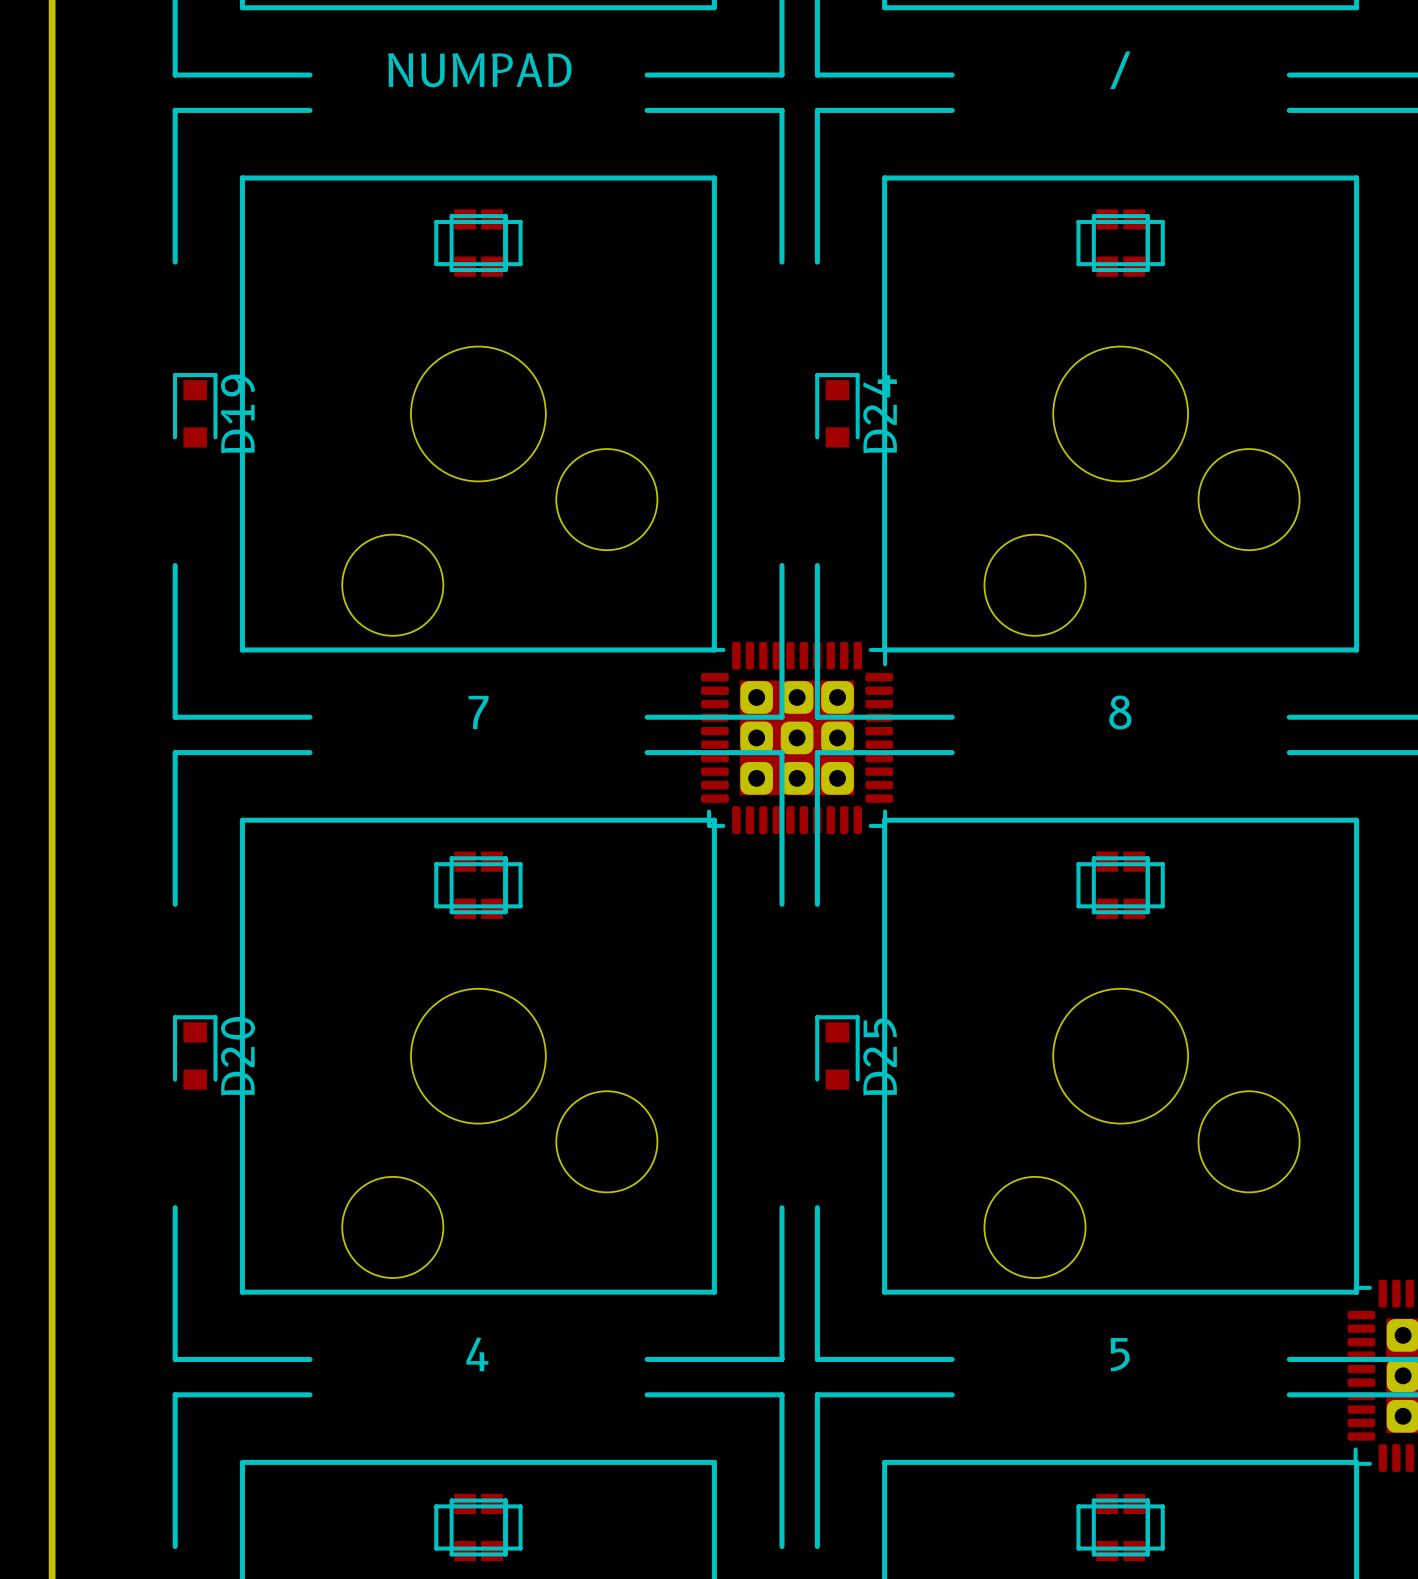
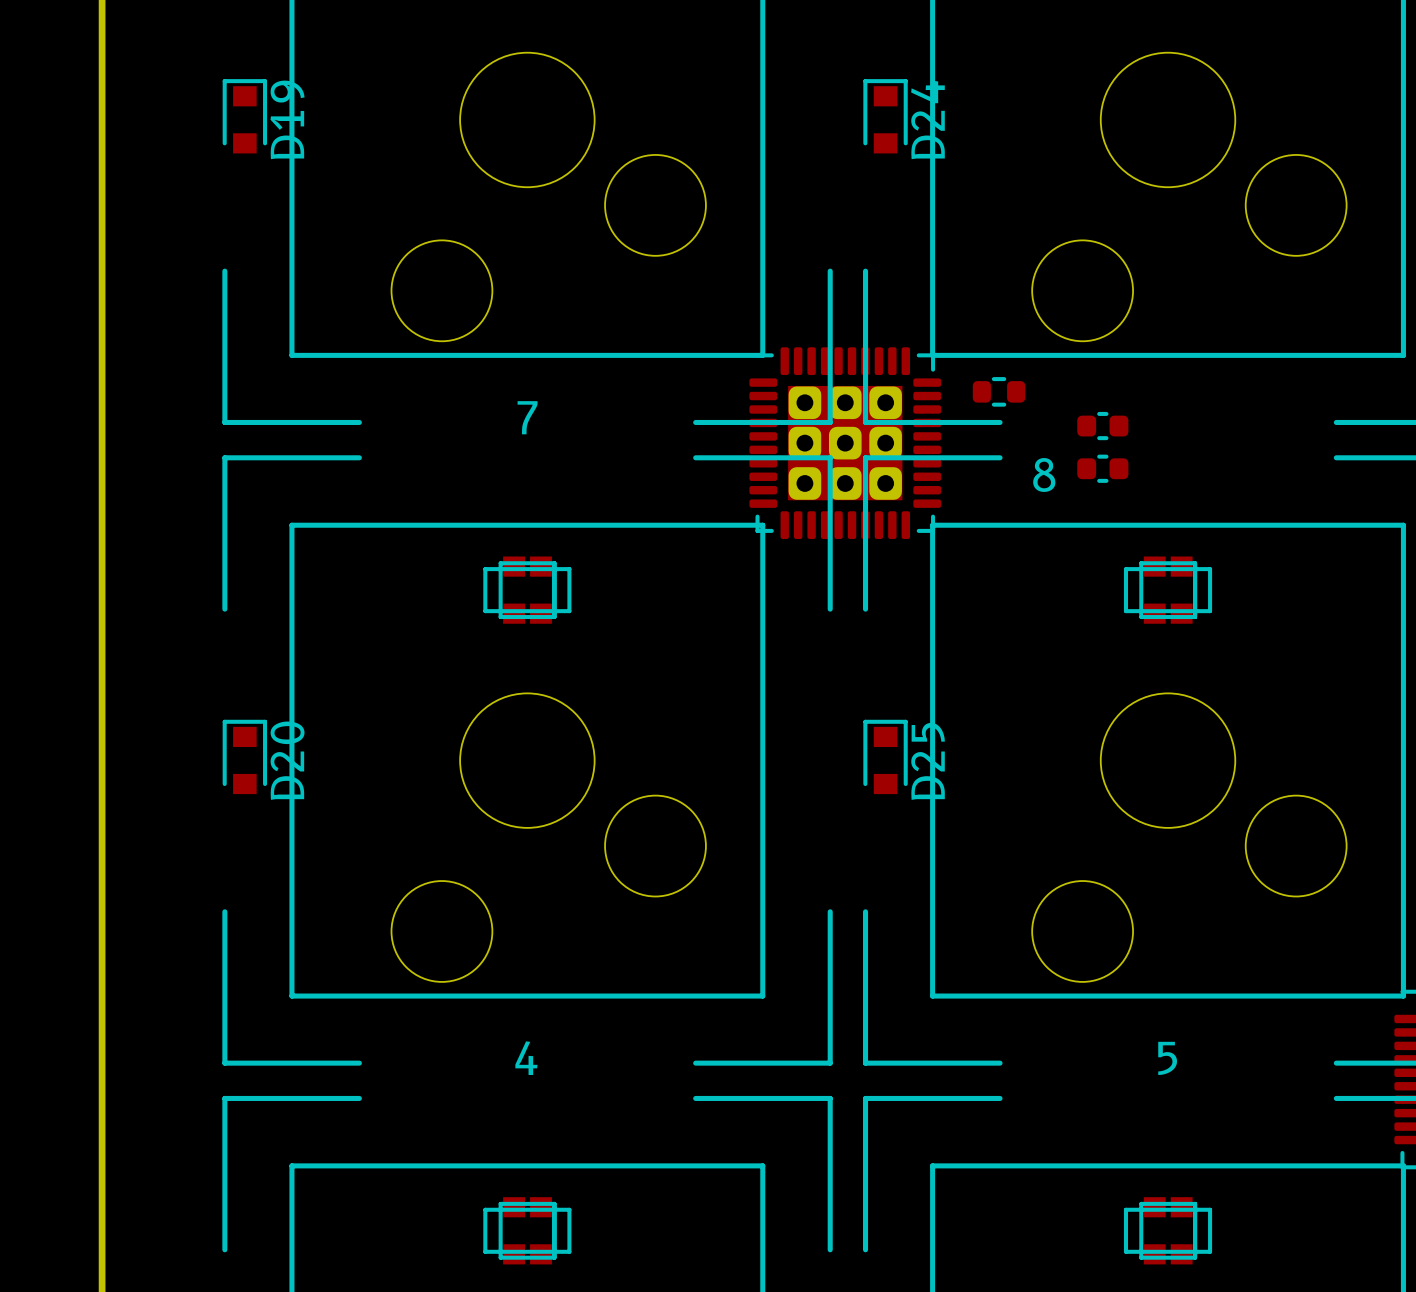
part: none -> (999, 391)
part value position: 8 (1120, 712) -> 8 (1044, 474)
part: none -> (1102, 426)
part: none -> (1102, 468)

